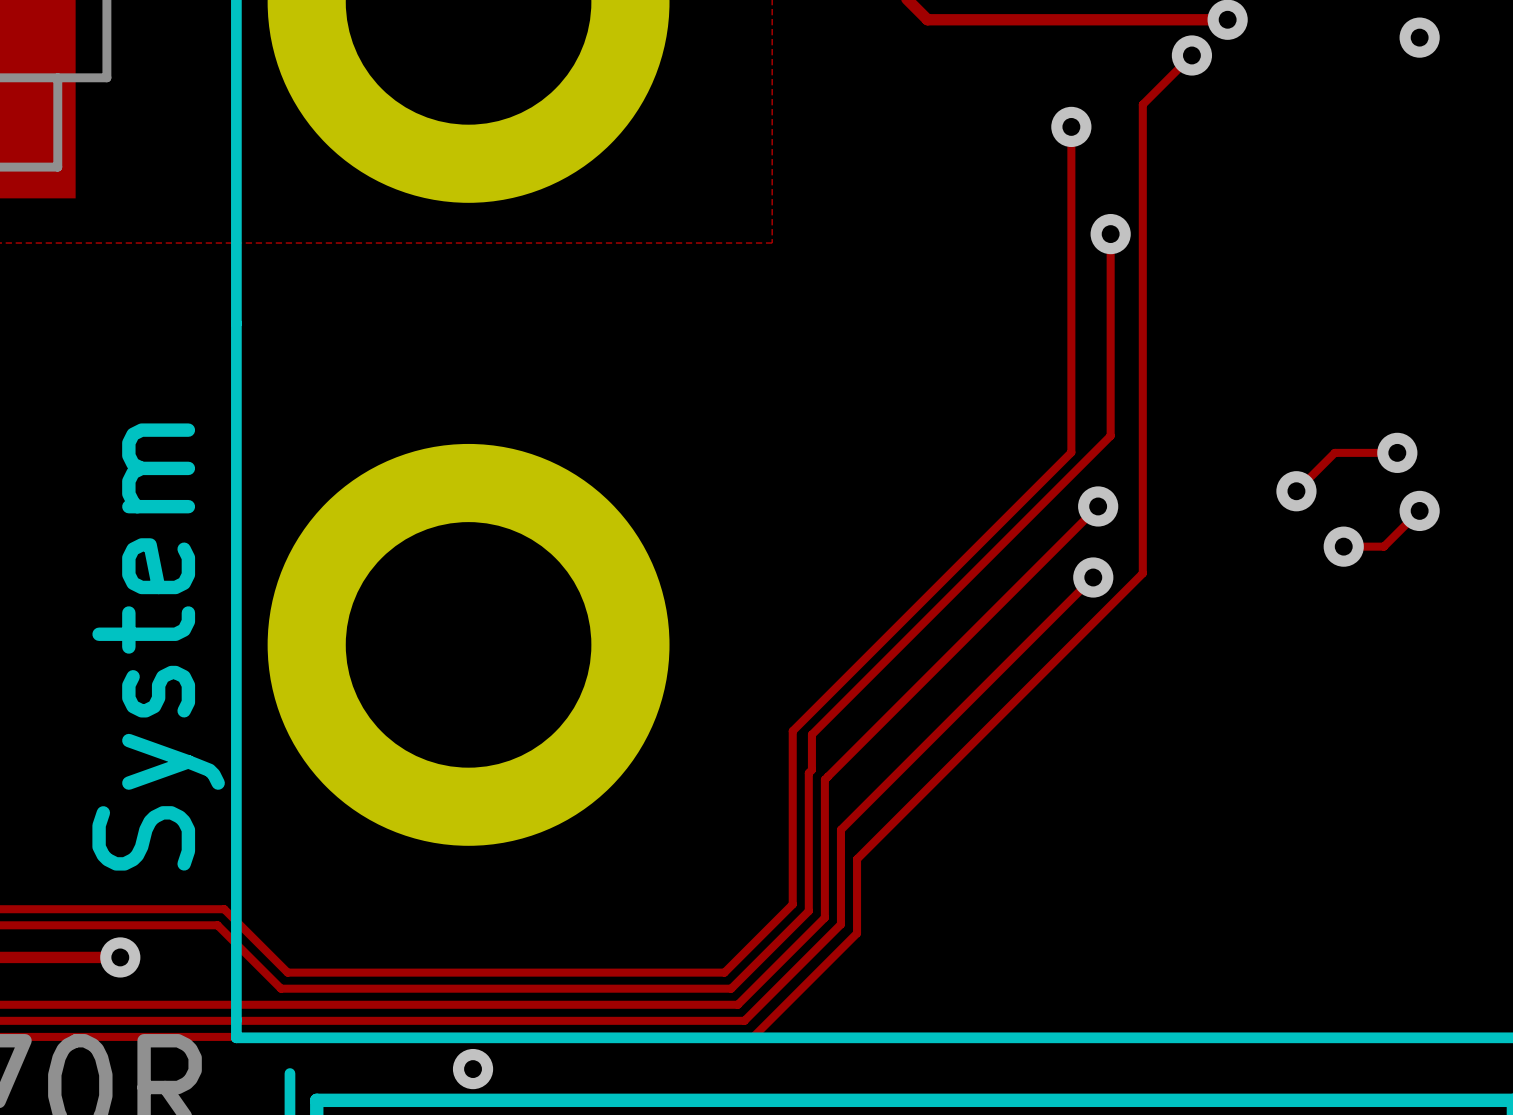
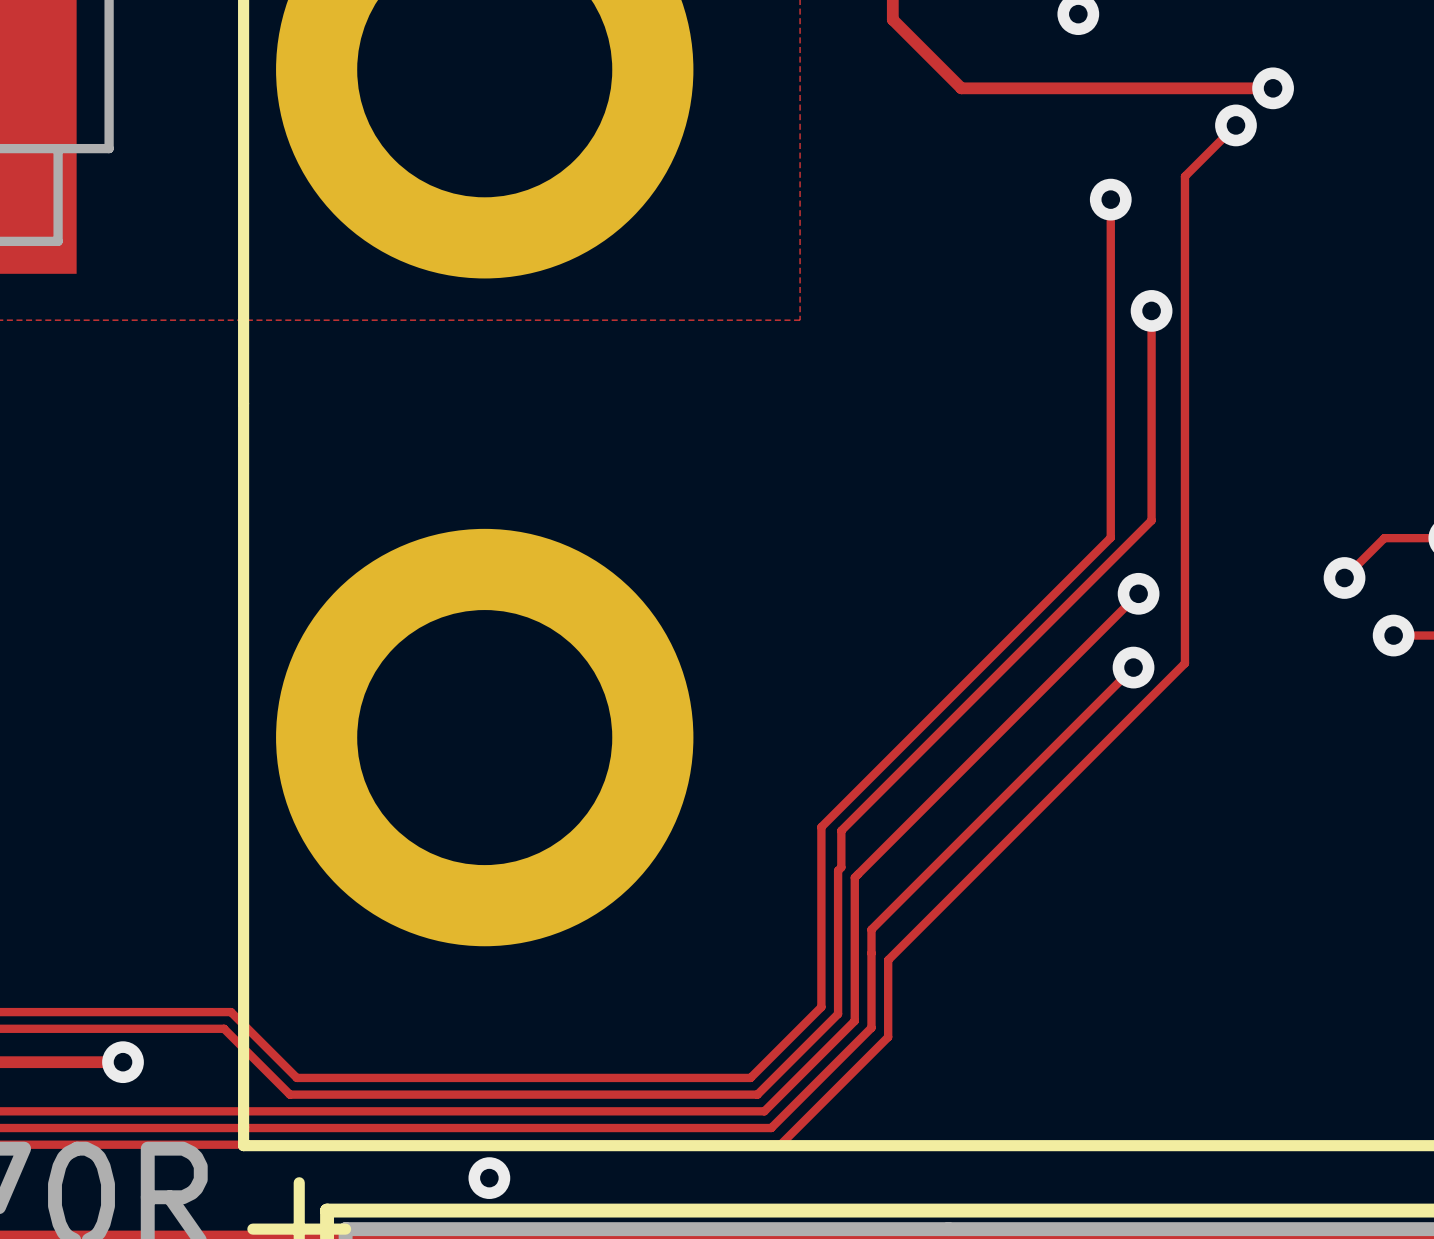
text: System (158, 647) -> none

